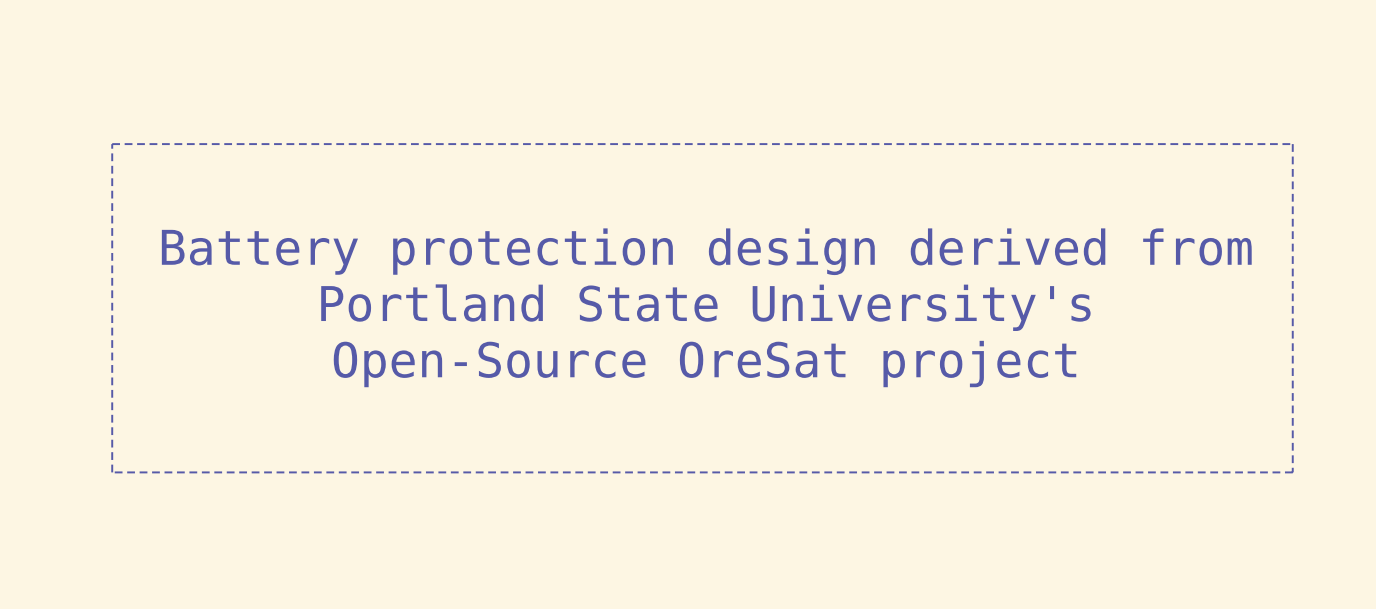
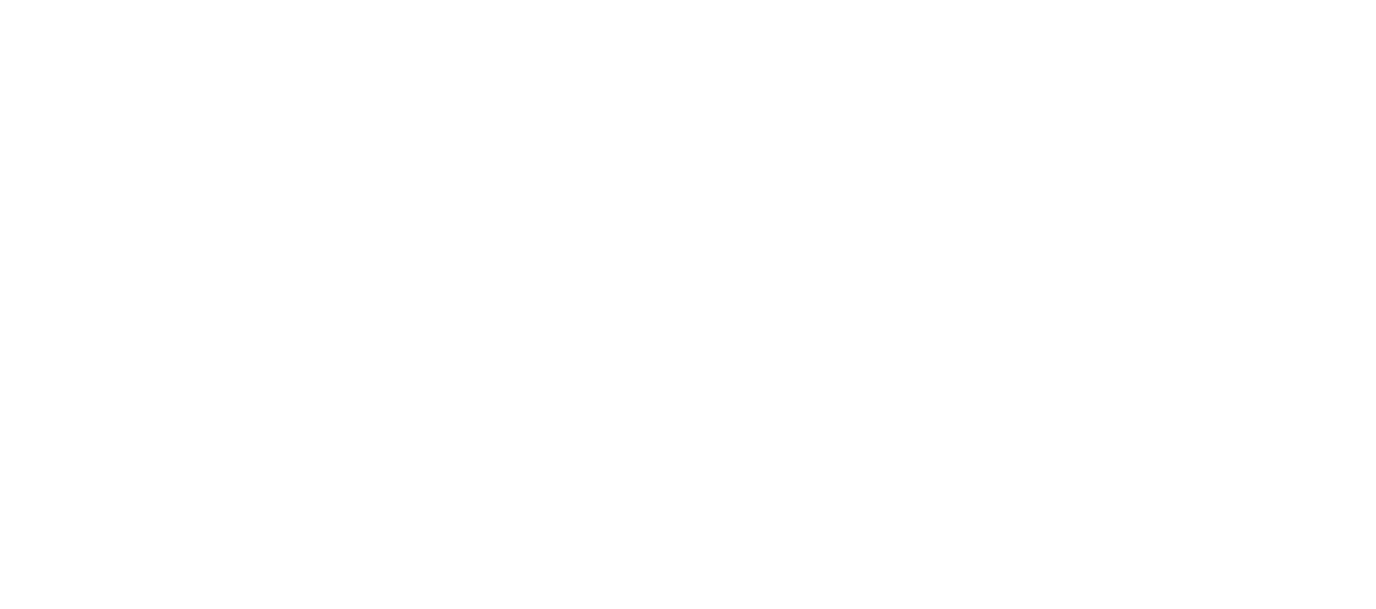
line: (112, 144) (1292, 144) (1292, 472) (112, 472) (112, 144) -> none
text: Battery protection design derived from (706, 251) -> none
text: Portland State University's (705, 307) -> none
text: Open-Source OreSat project (704, 364) -> none

